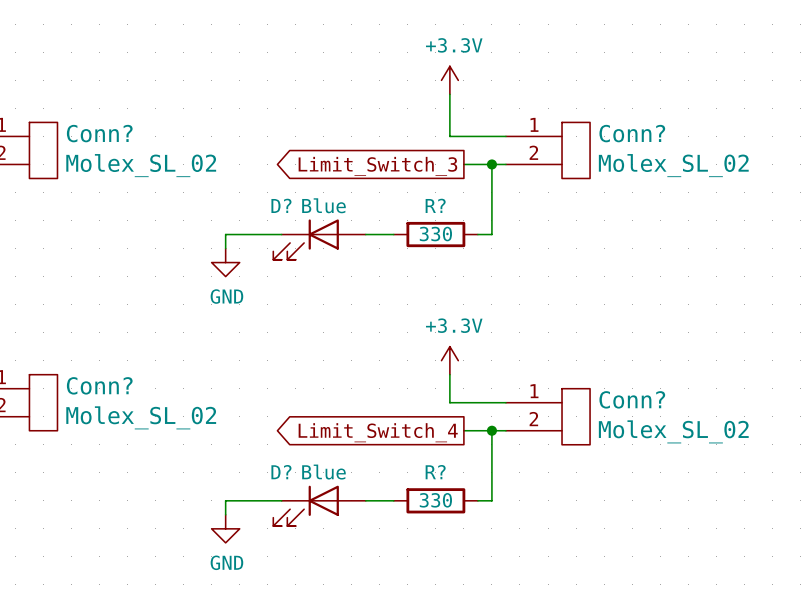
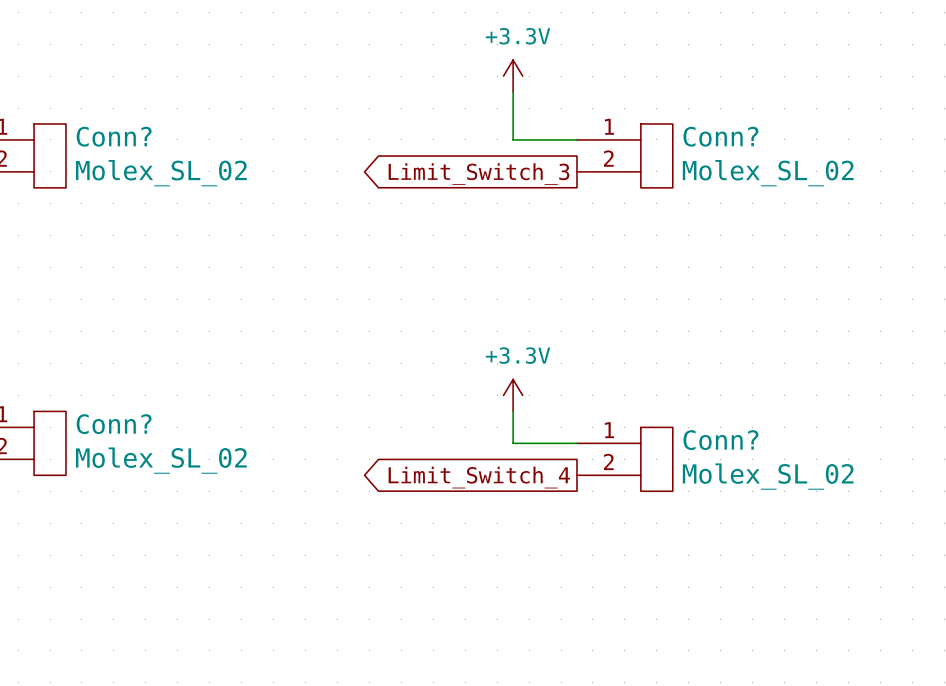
wire: (463, 164) (505, 164) -> none
wire: (491, 164) (491, 234) (477, 234) -> none
junction: (491, 164) -> none
global label position: Limit_Switch_3 (377, 166) -> Limit_Switch_3 (479, 174)
wire: (281, 234) (225, 234) (225, 248) -> none
wire: (365, 234) (393, 234) -> none
R?: 330 (435, 234) -> none
D?: Blue (319, 239) -> none
power symbol: GND (225, 262) -> none
wire: (463, 430) (505, 430) -> none
wire: (491, 430) (491, 500) (477, 500) -> none
junction: (491, 430) -> none
global label position: Limit_Switch_4 (378, 432) -> Limit_Switch_4 (479, 477)
wire: (281, 500) (225, 500) (225, 514) -> none
wire: (365, 500) (393, 500) -> none
R?: 330 (435, 500) -> none
D?: Blue (319, 505) -> none
power symbol: GND (225, 528) -> none

